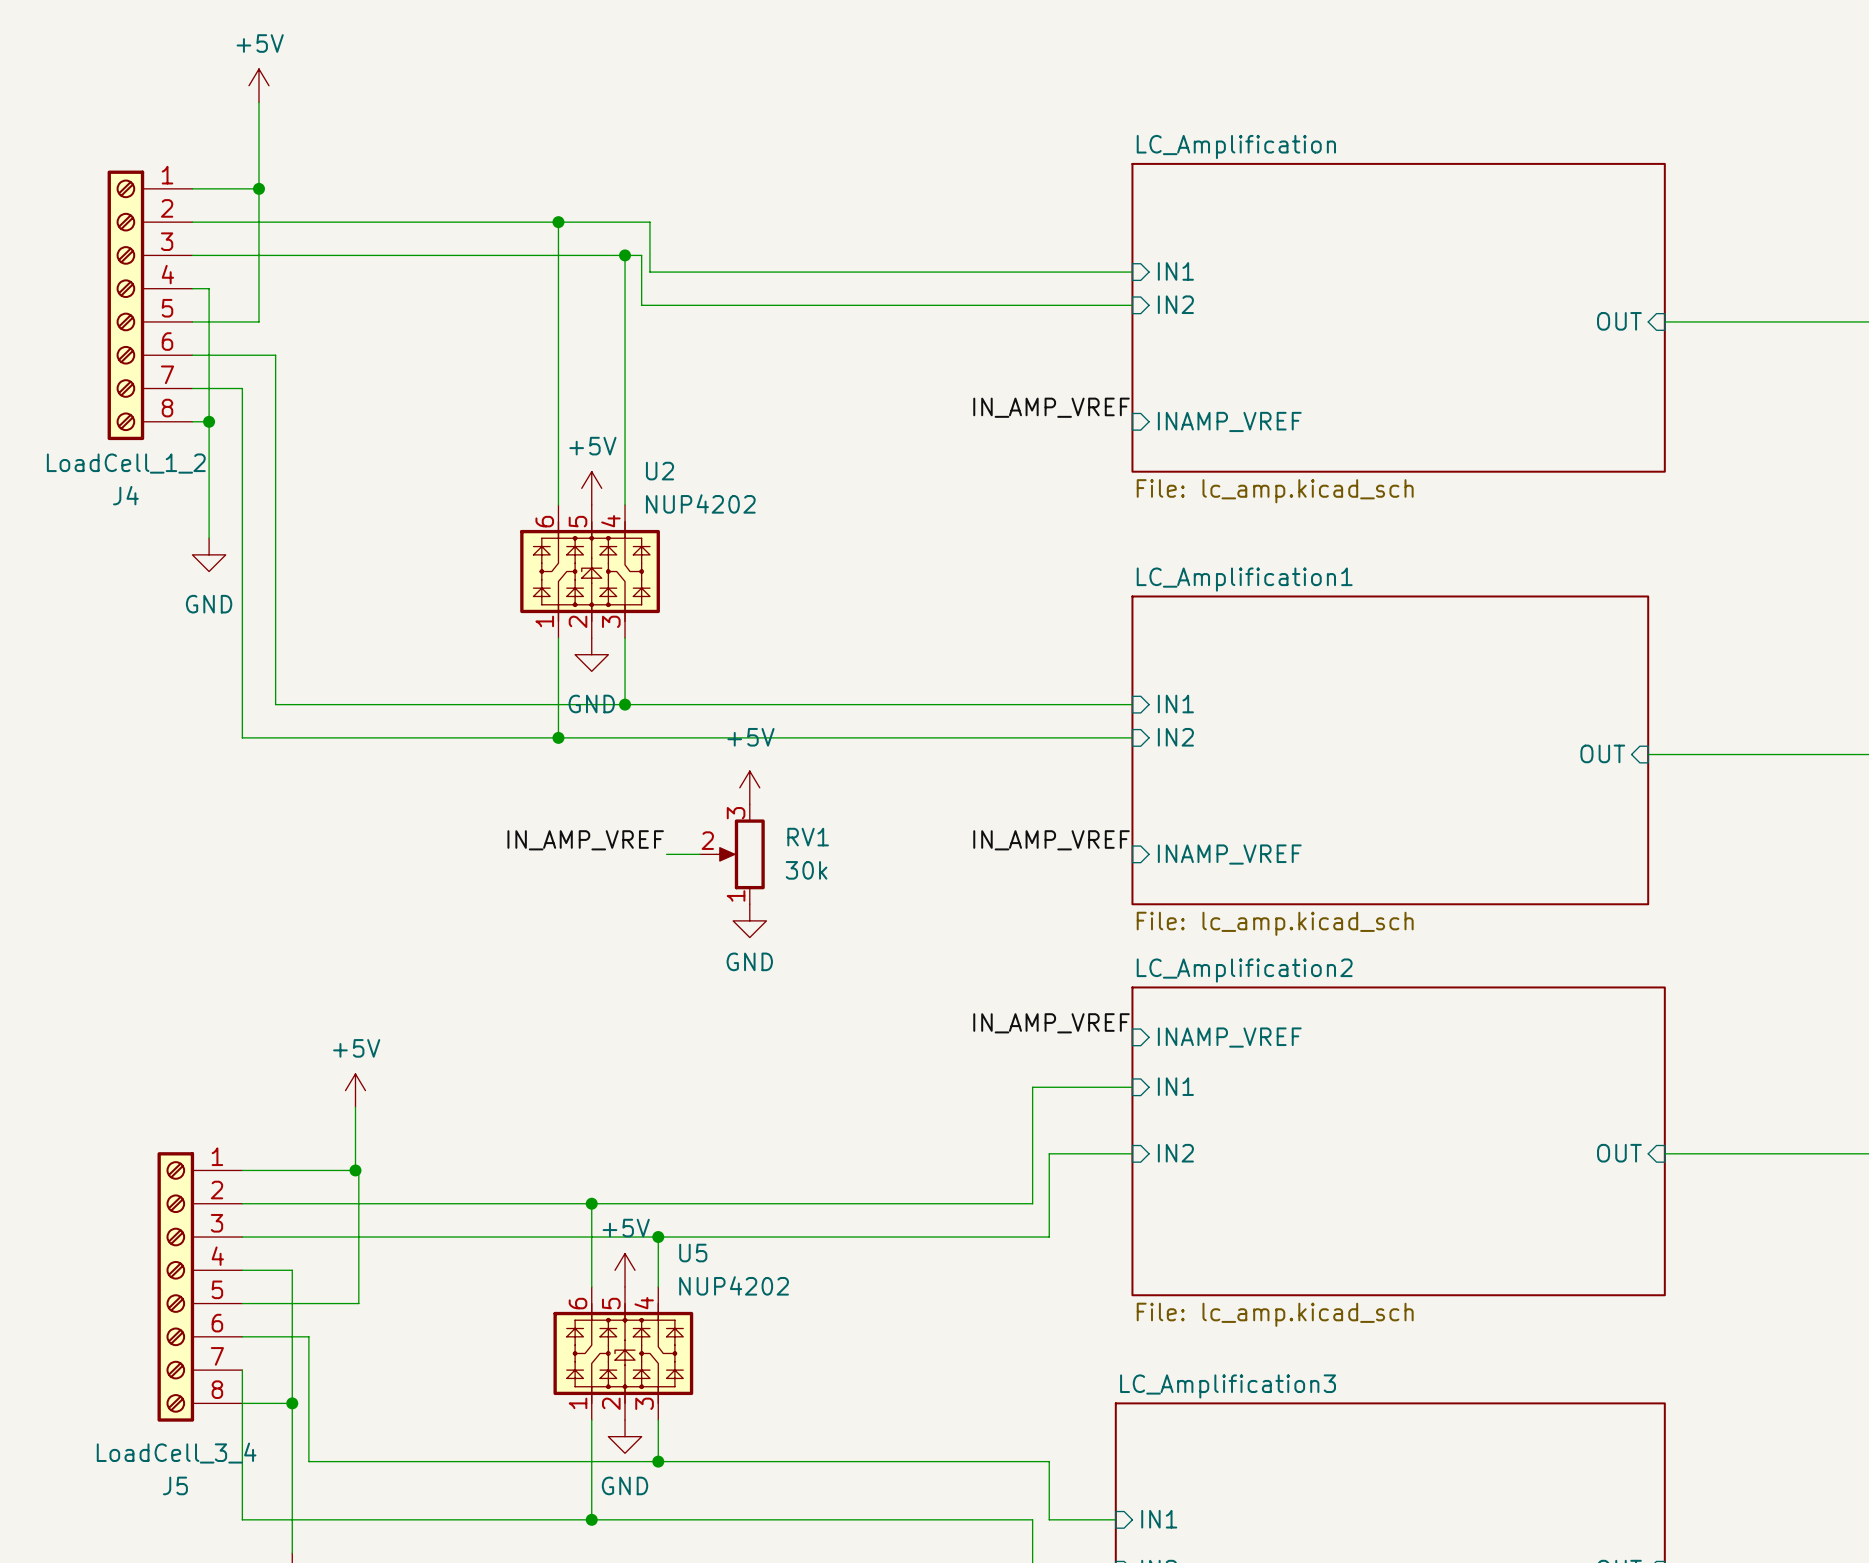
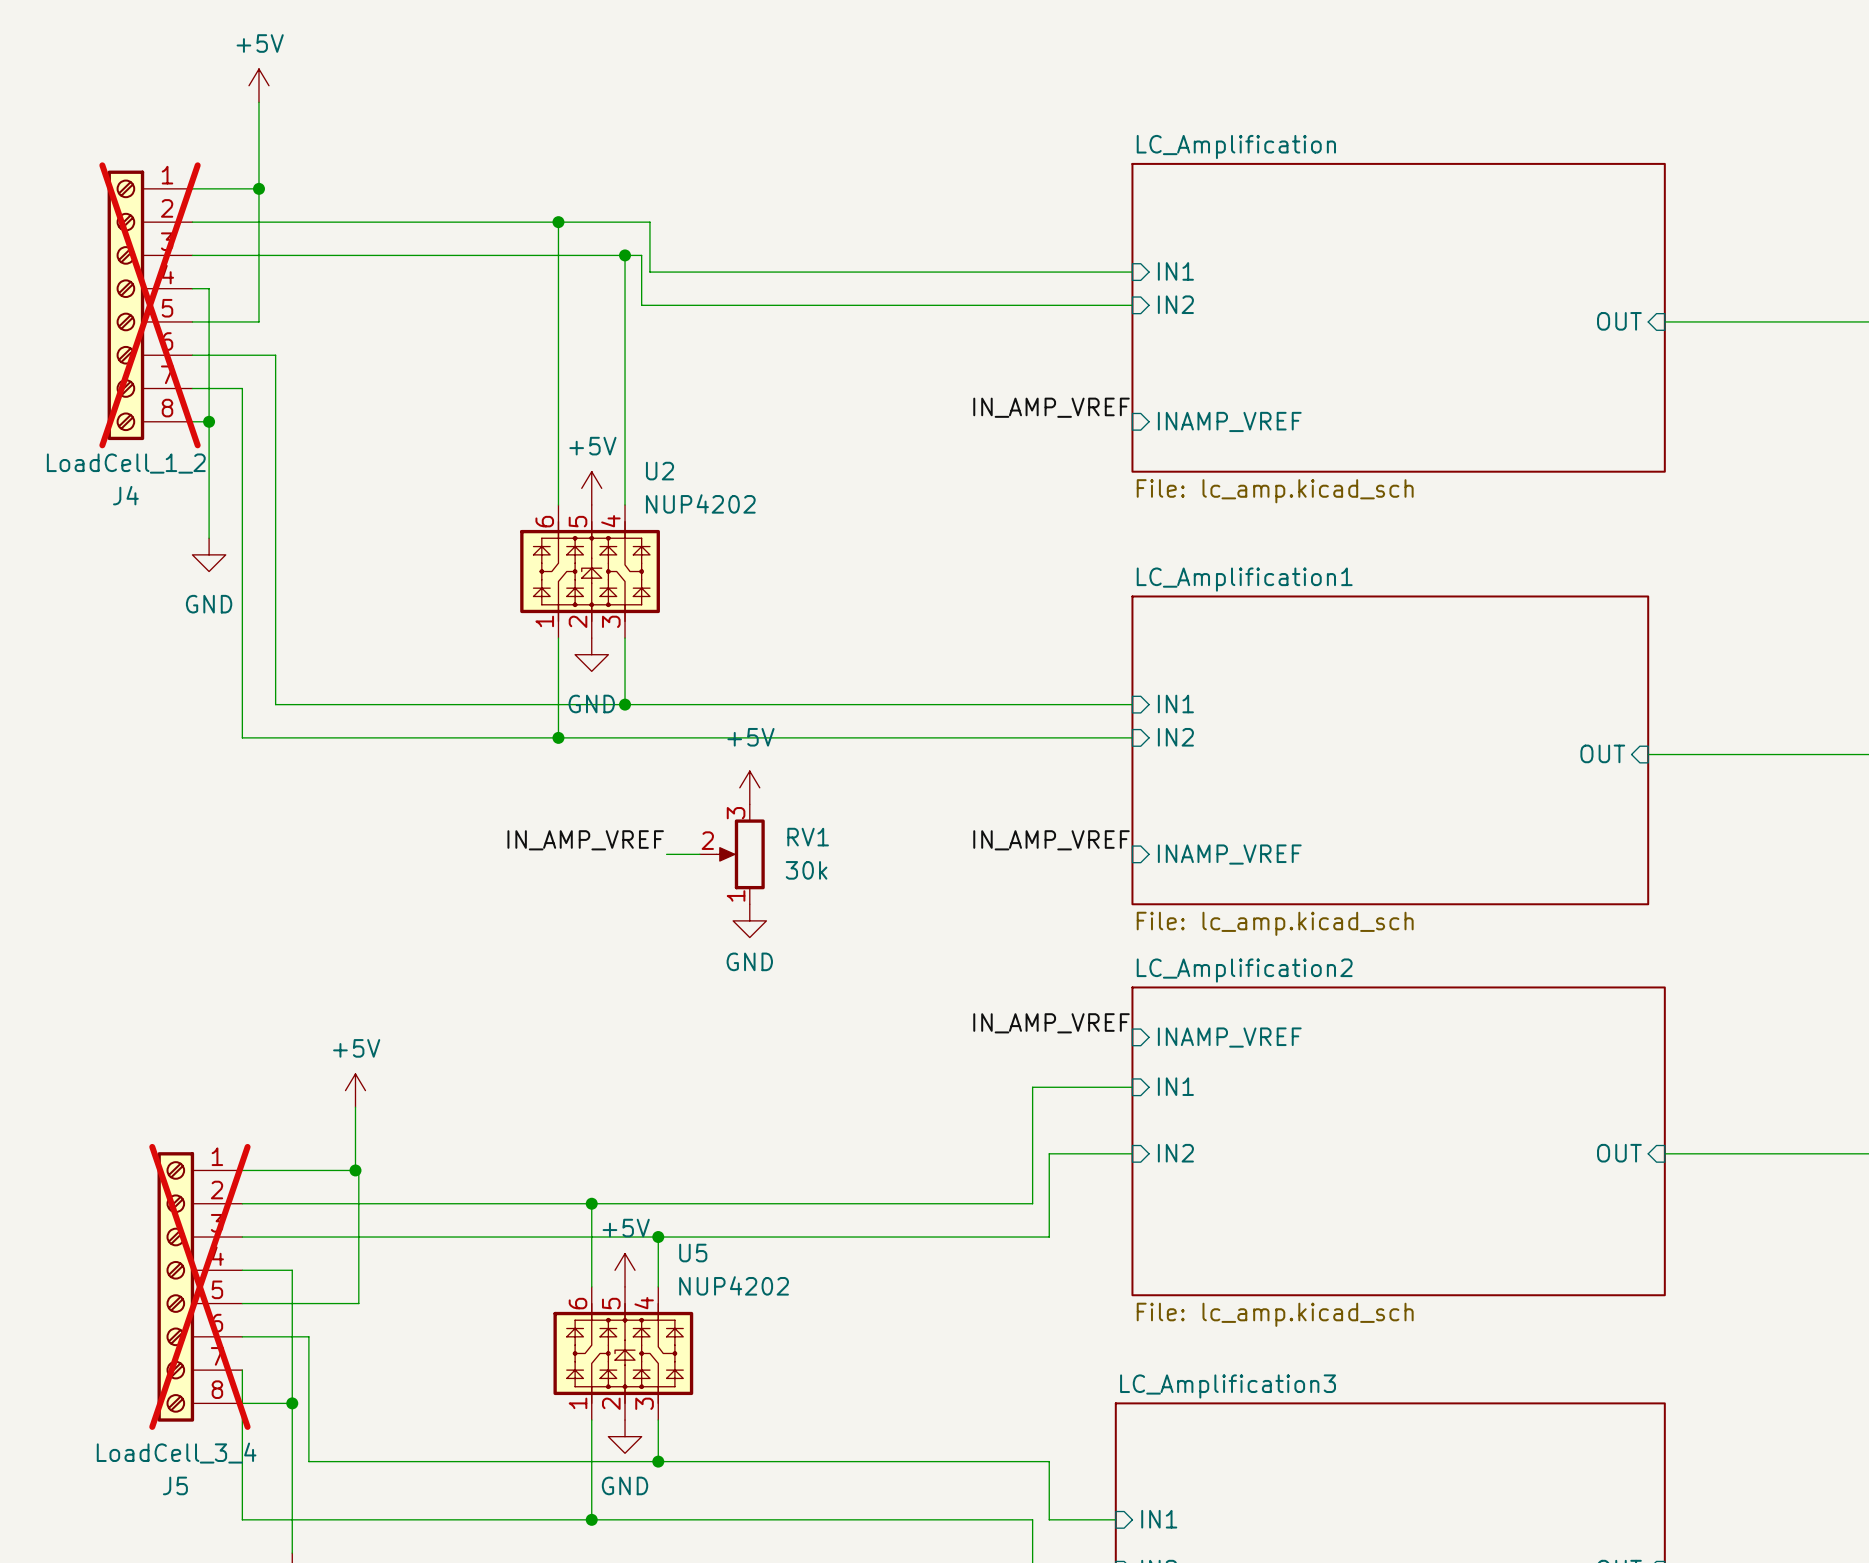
J4 do-not-place cross: none -> (150, 305)
J5 do-not-place cross: none -> (199, 1286)

